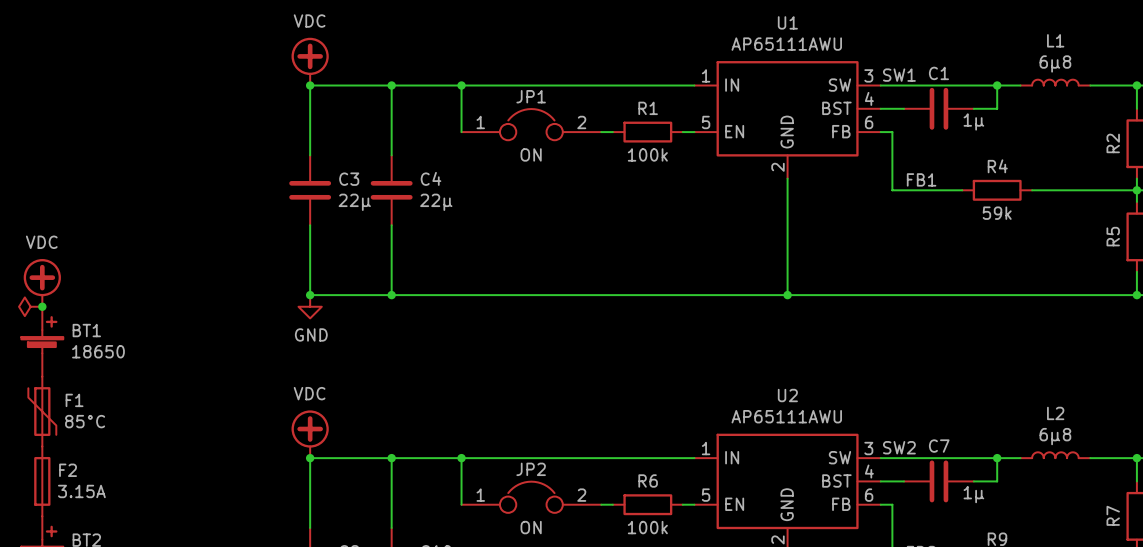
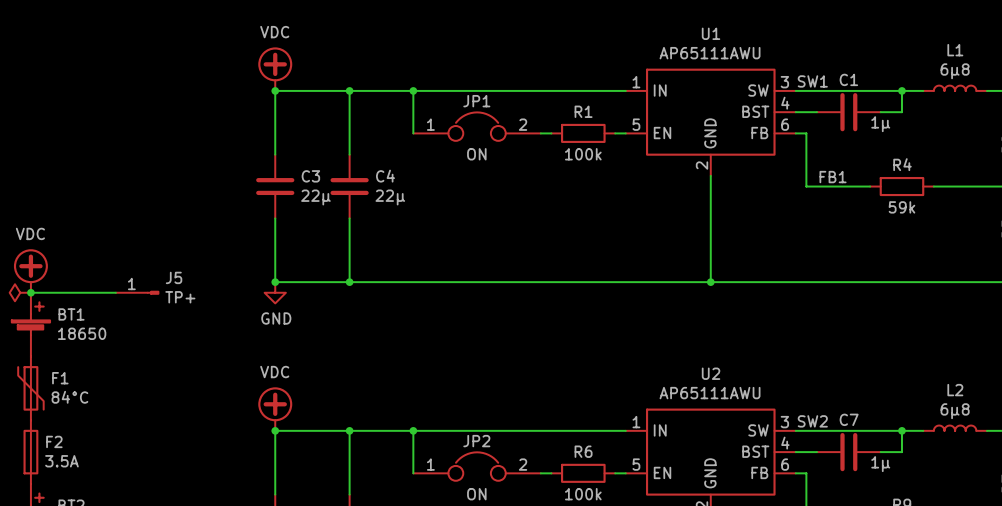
wire: none -> (30, 292) (115, 292)
J5: none -> TP+ (137, 292)
F1 value: 85°C (85, 421) -> 84°C (69, 397)
F2 value: 3.15A (81, 491) -> 3.5A (61, 461)

